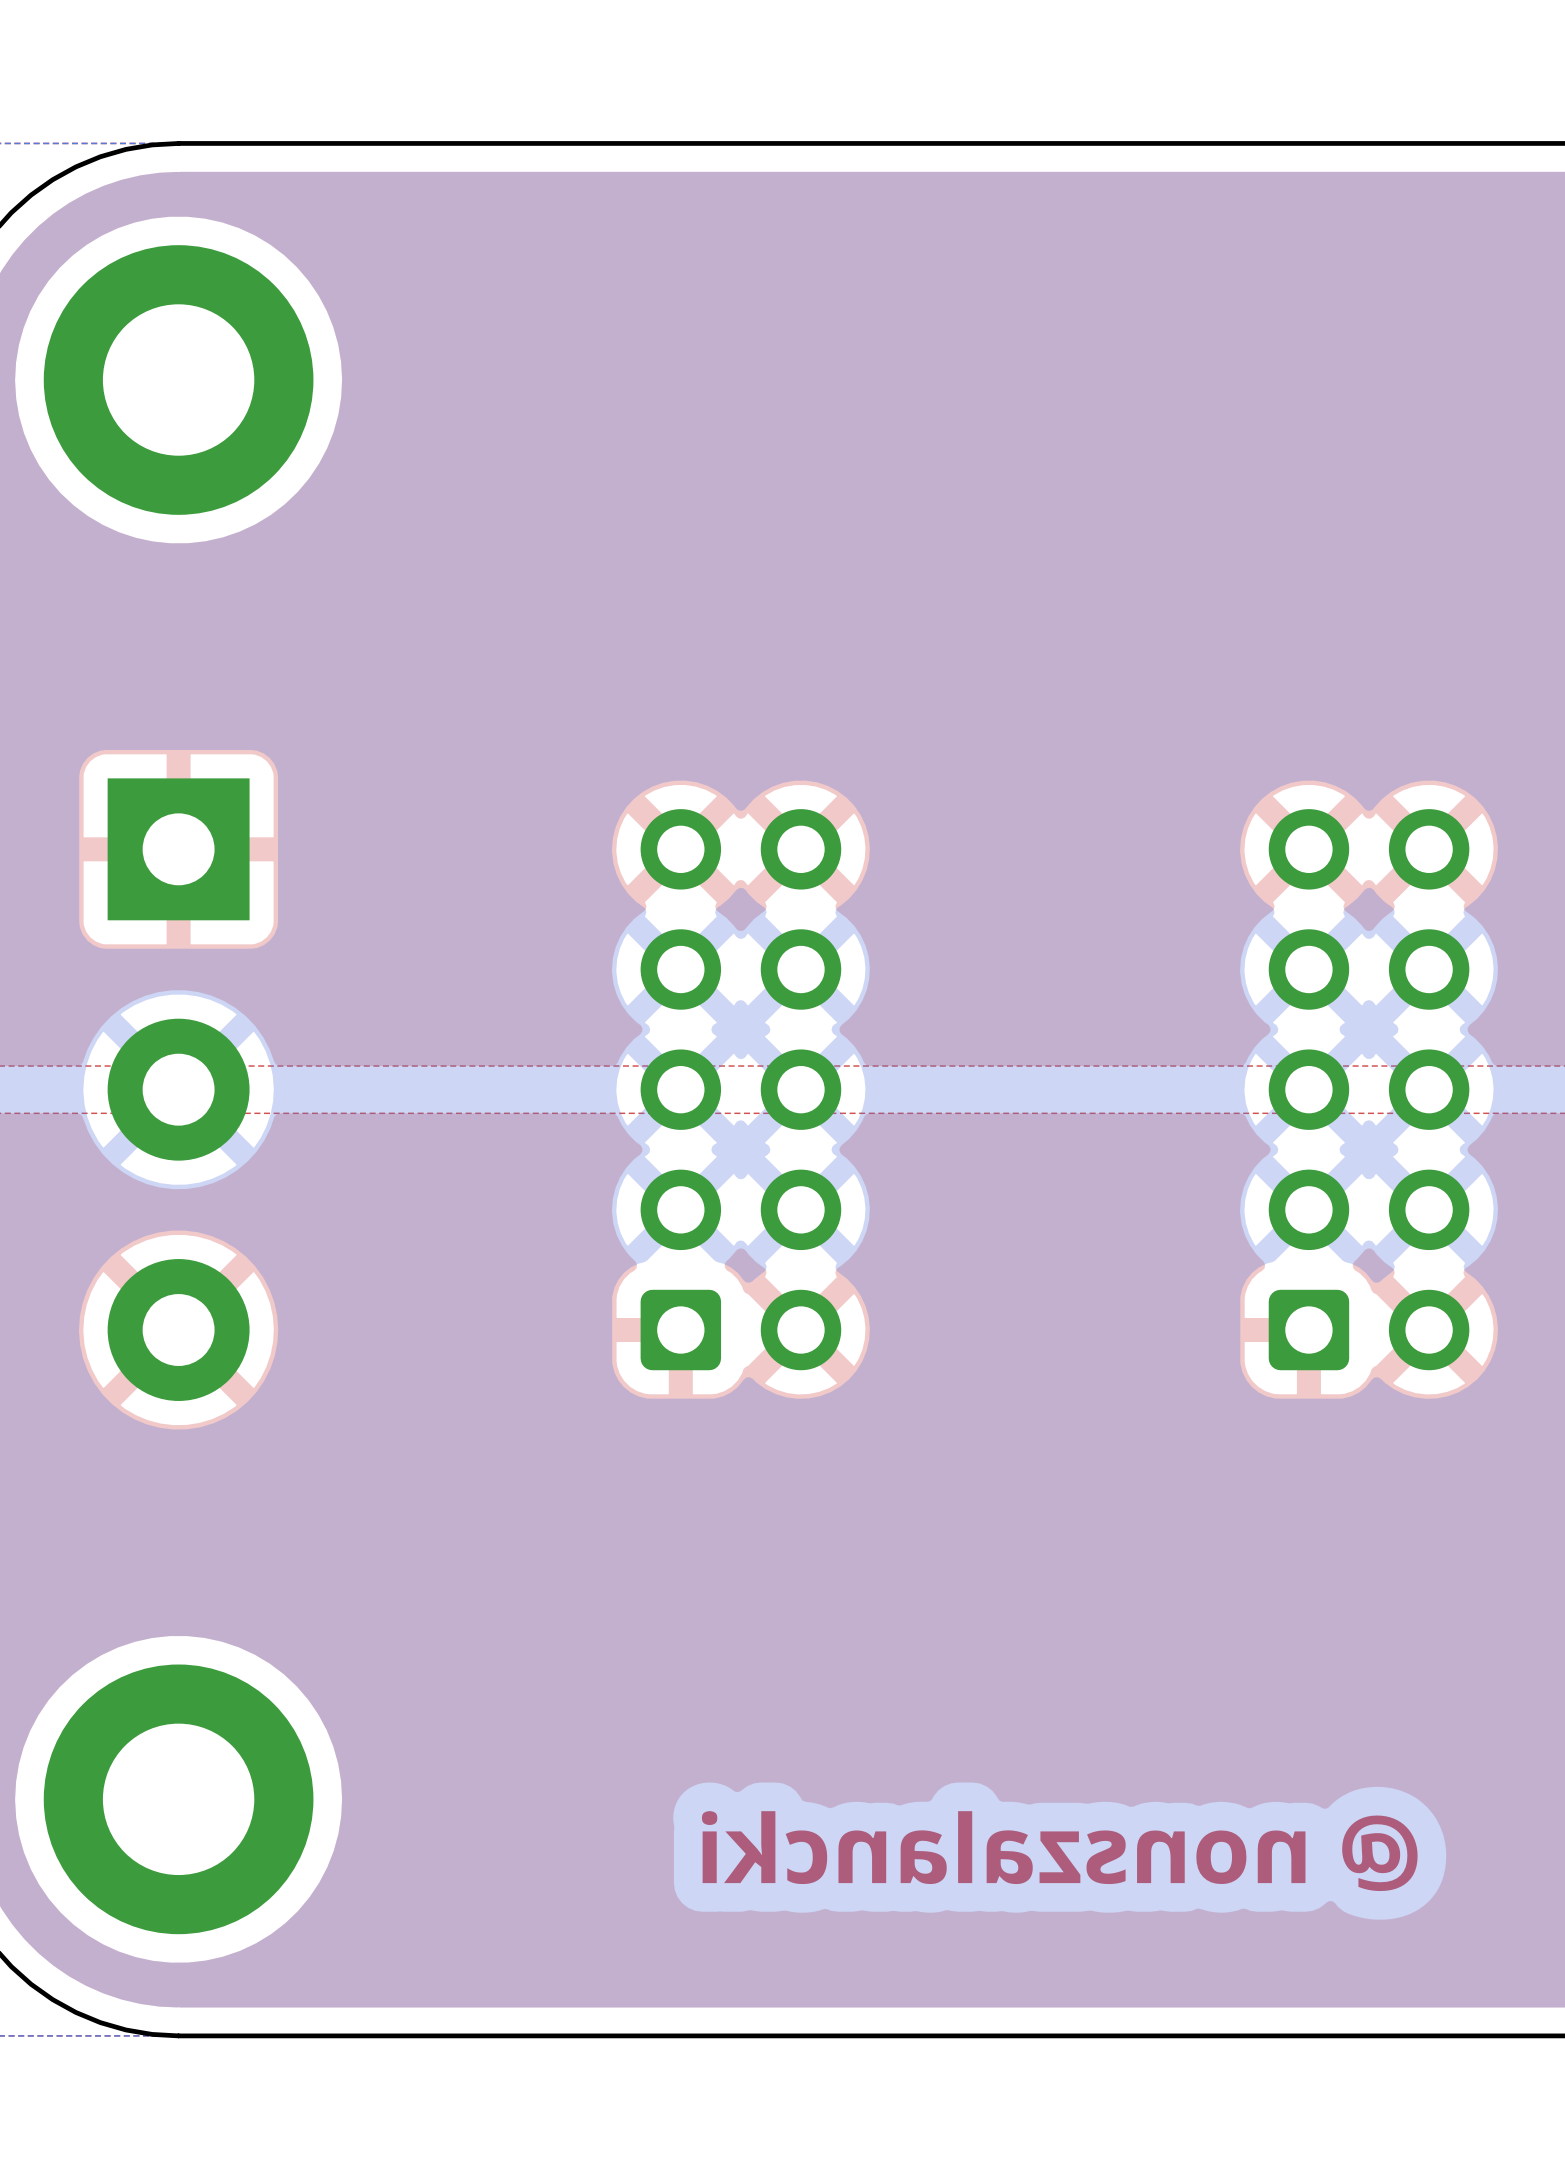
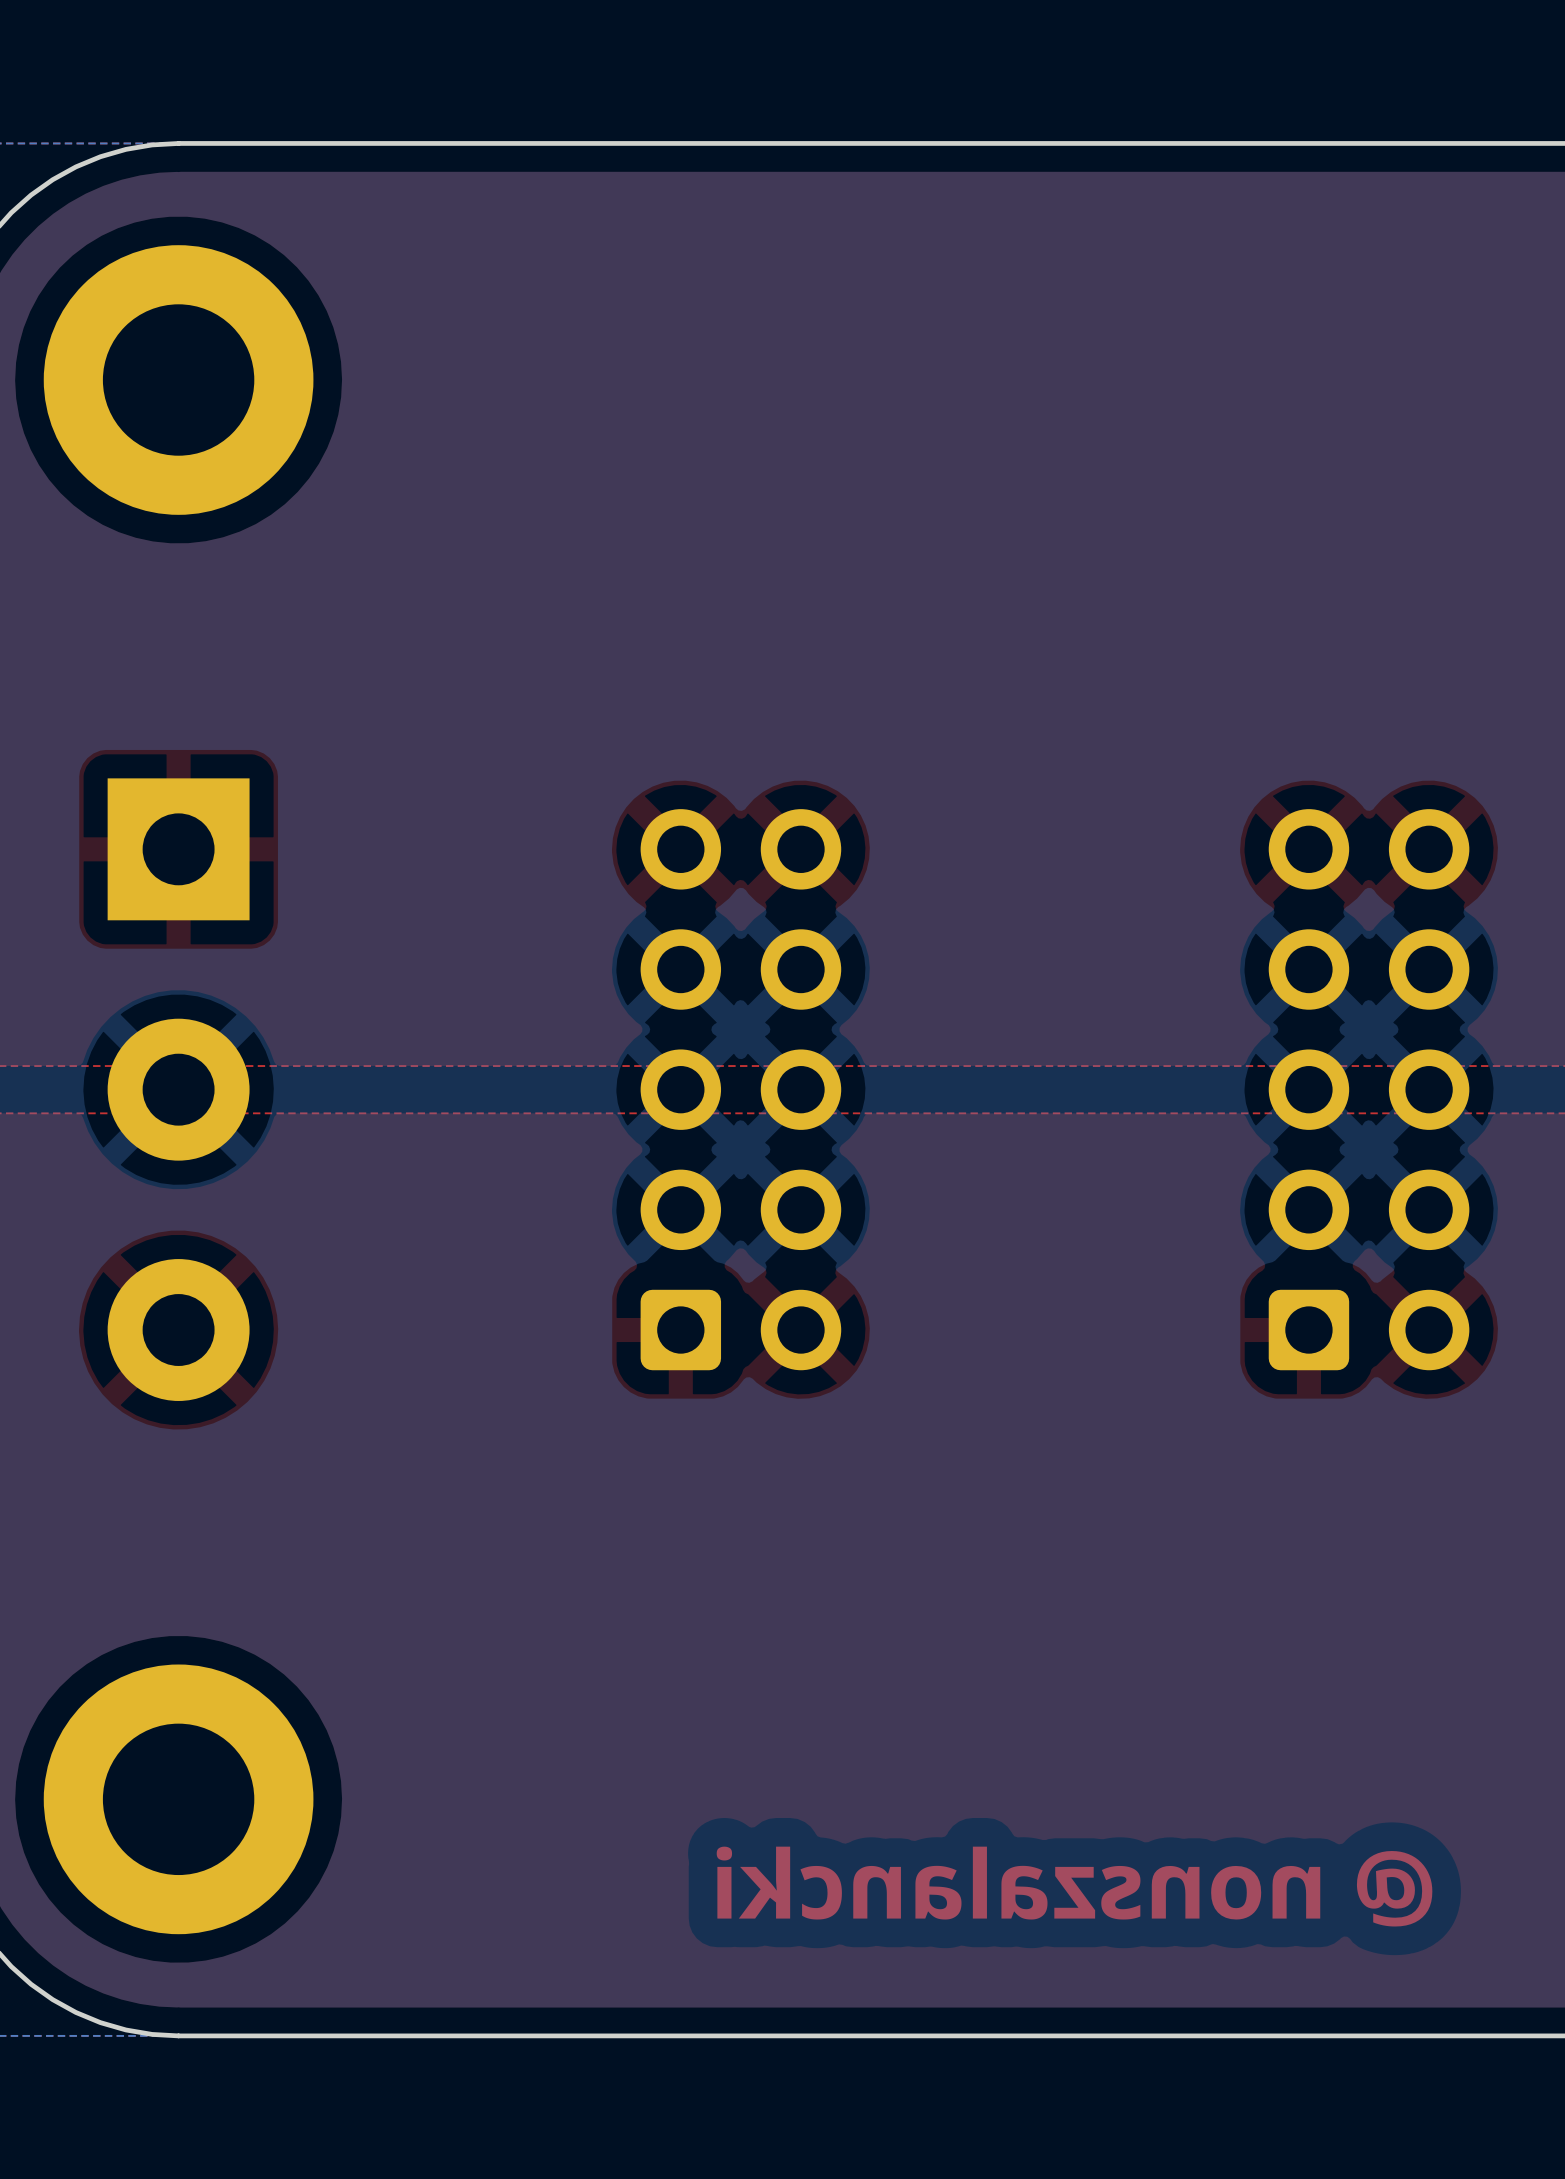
part position: (1059, 1851) -> (1074, 1886)

